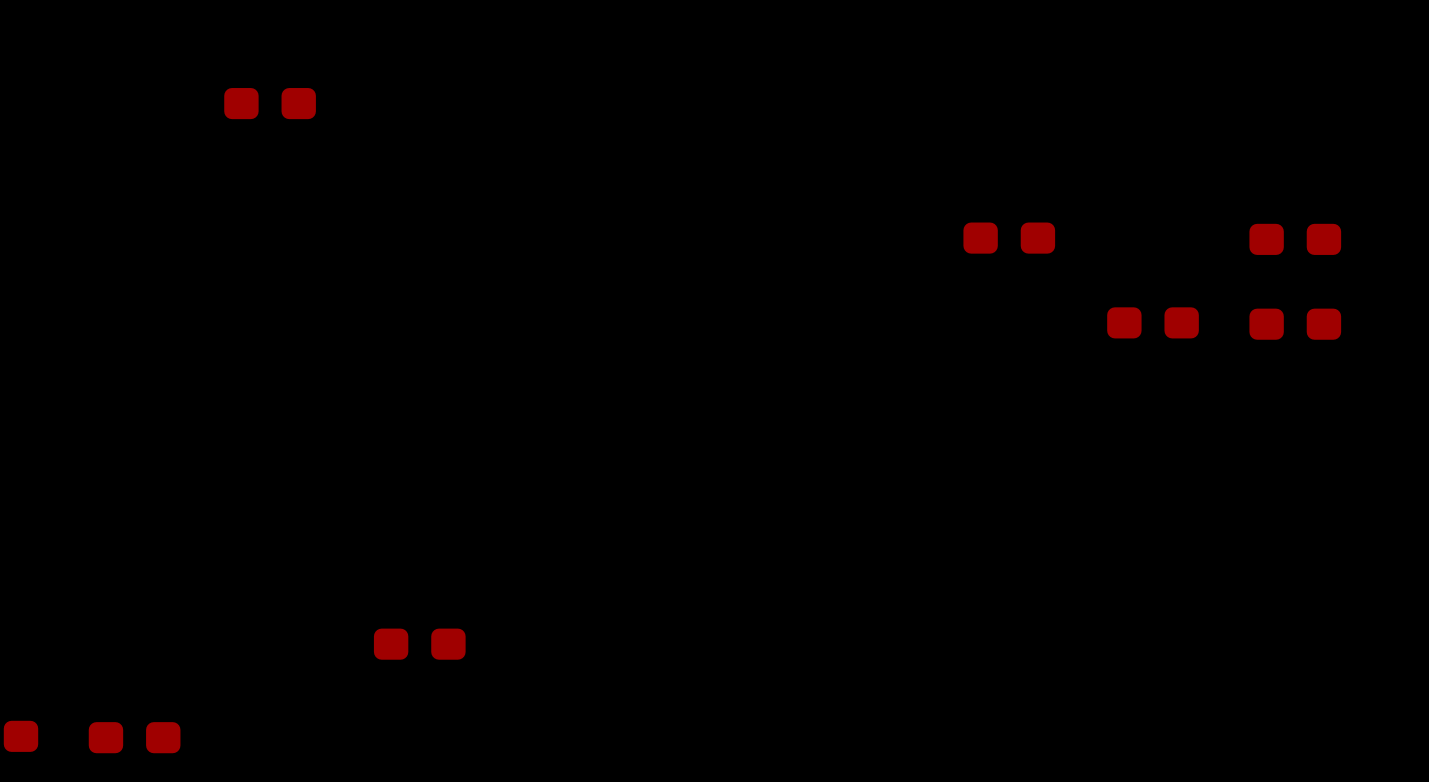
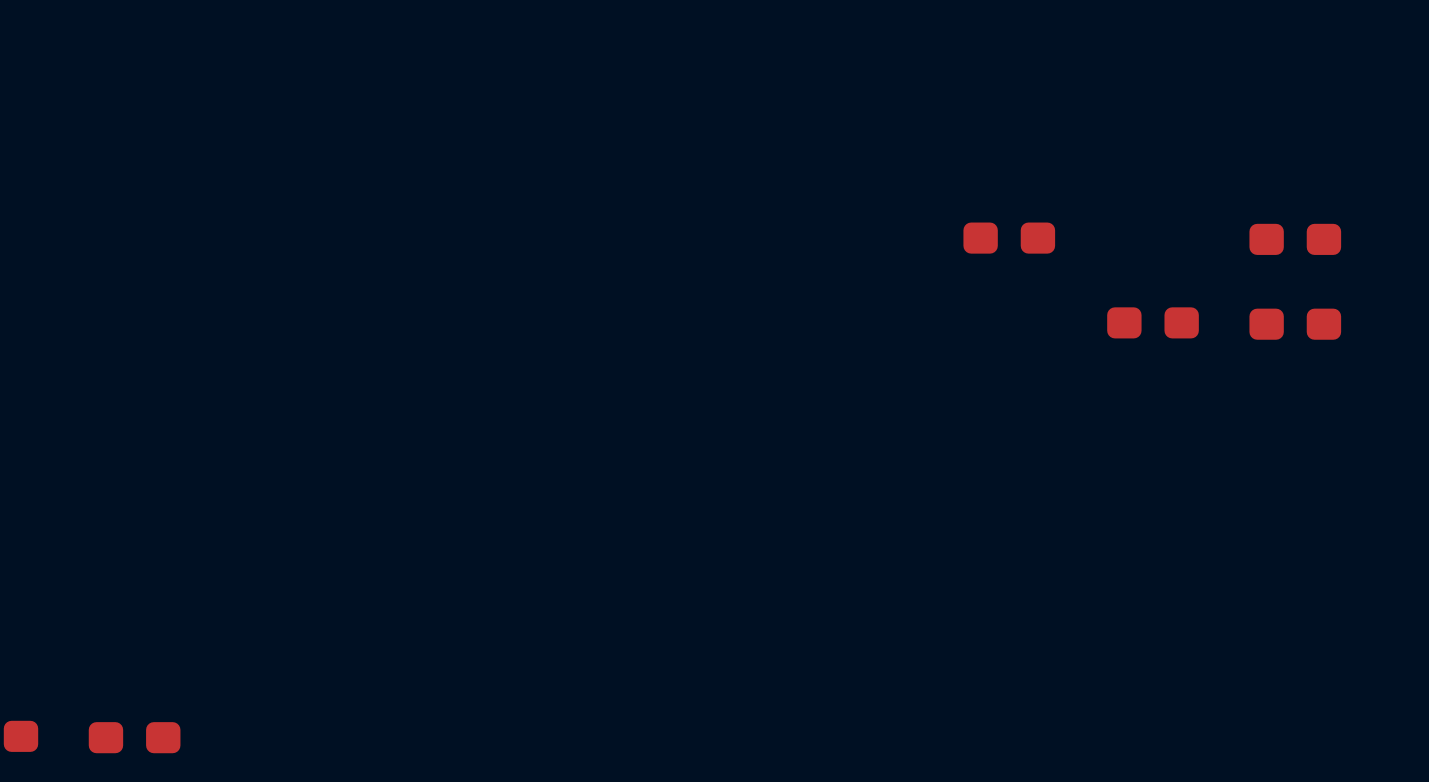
part: (270, 103) -> none
part: (419, 644) -> none

